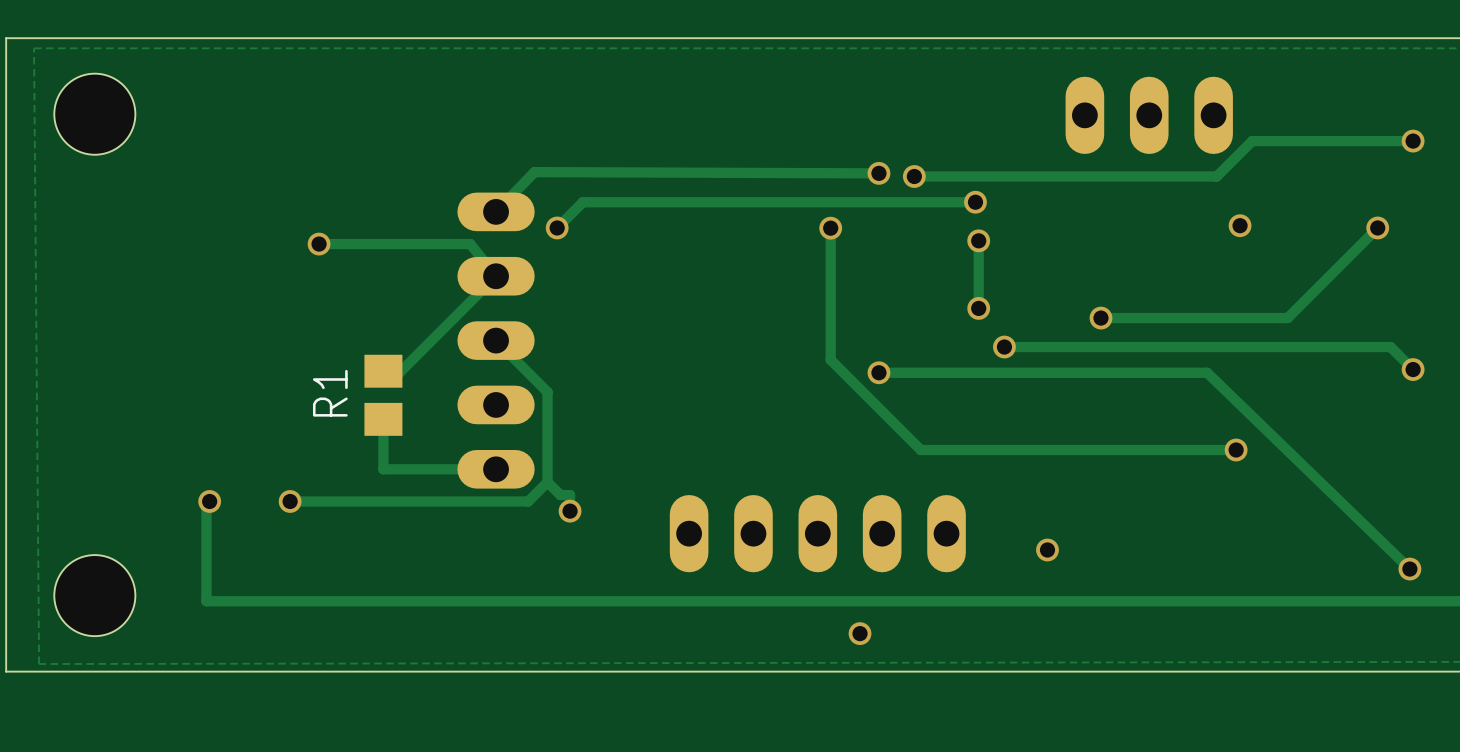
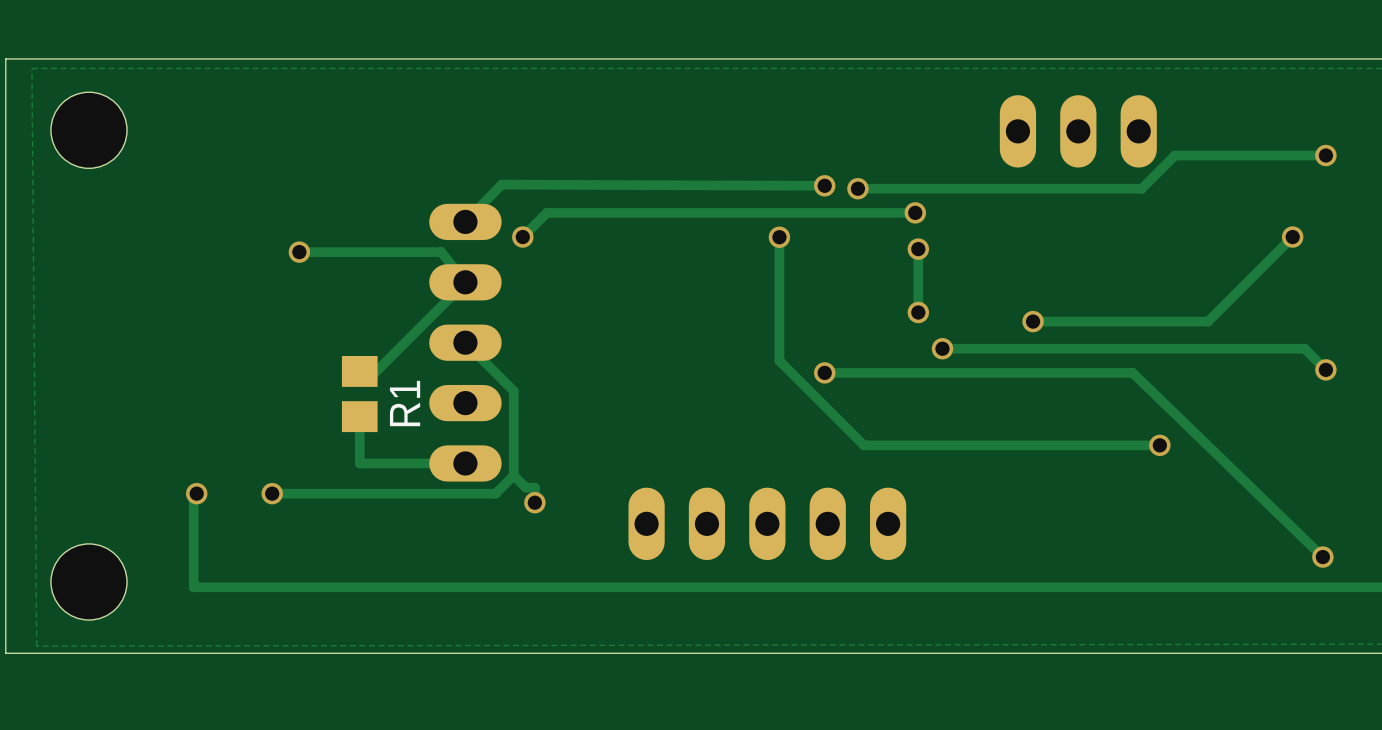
via: (1240, 225) -> none
R1 name position: R1 (330, 393) -> R1 (405, 403)
via: (1047, 550) -> none
via: (860, 633) -> none

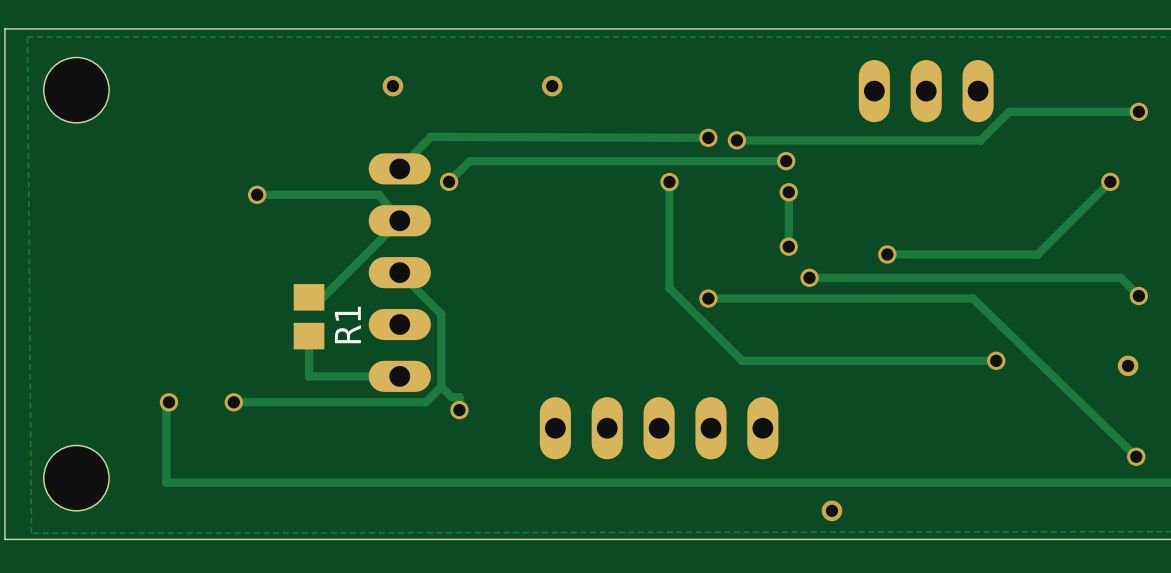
via: none -> (392, 86)
via: none -> (552, 86)
via: none -> (1128, 365)
via: none -> (831, 510)

